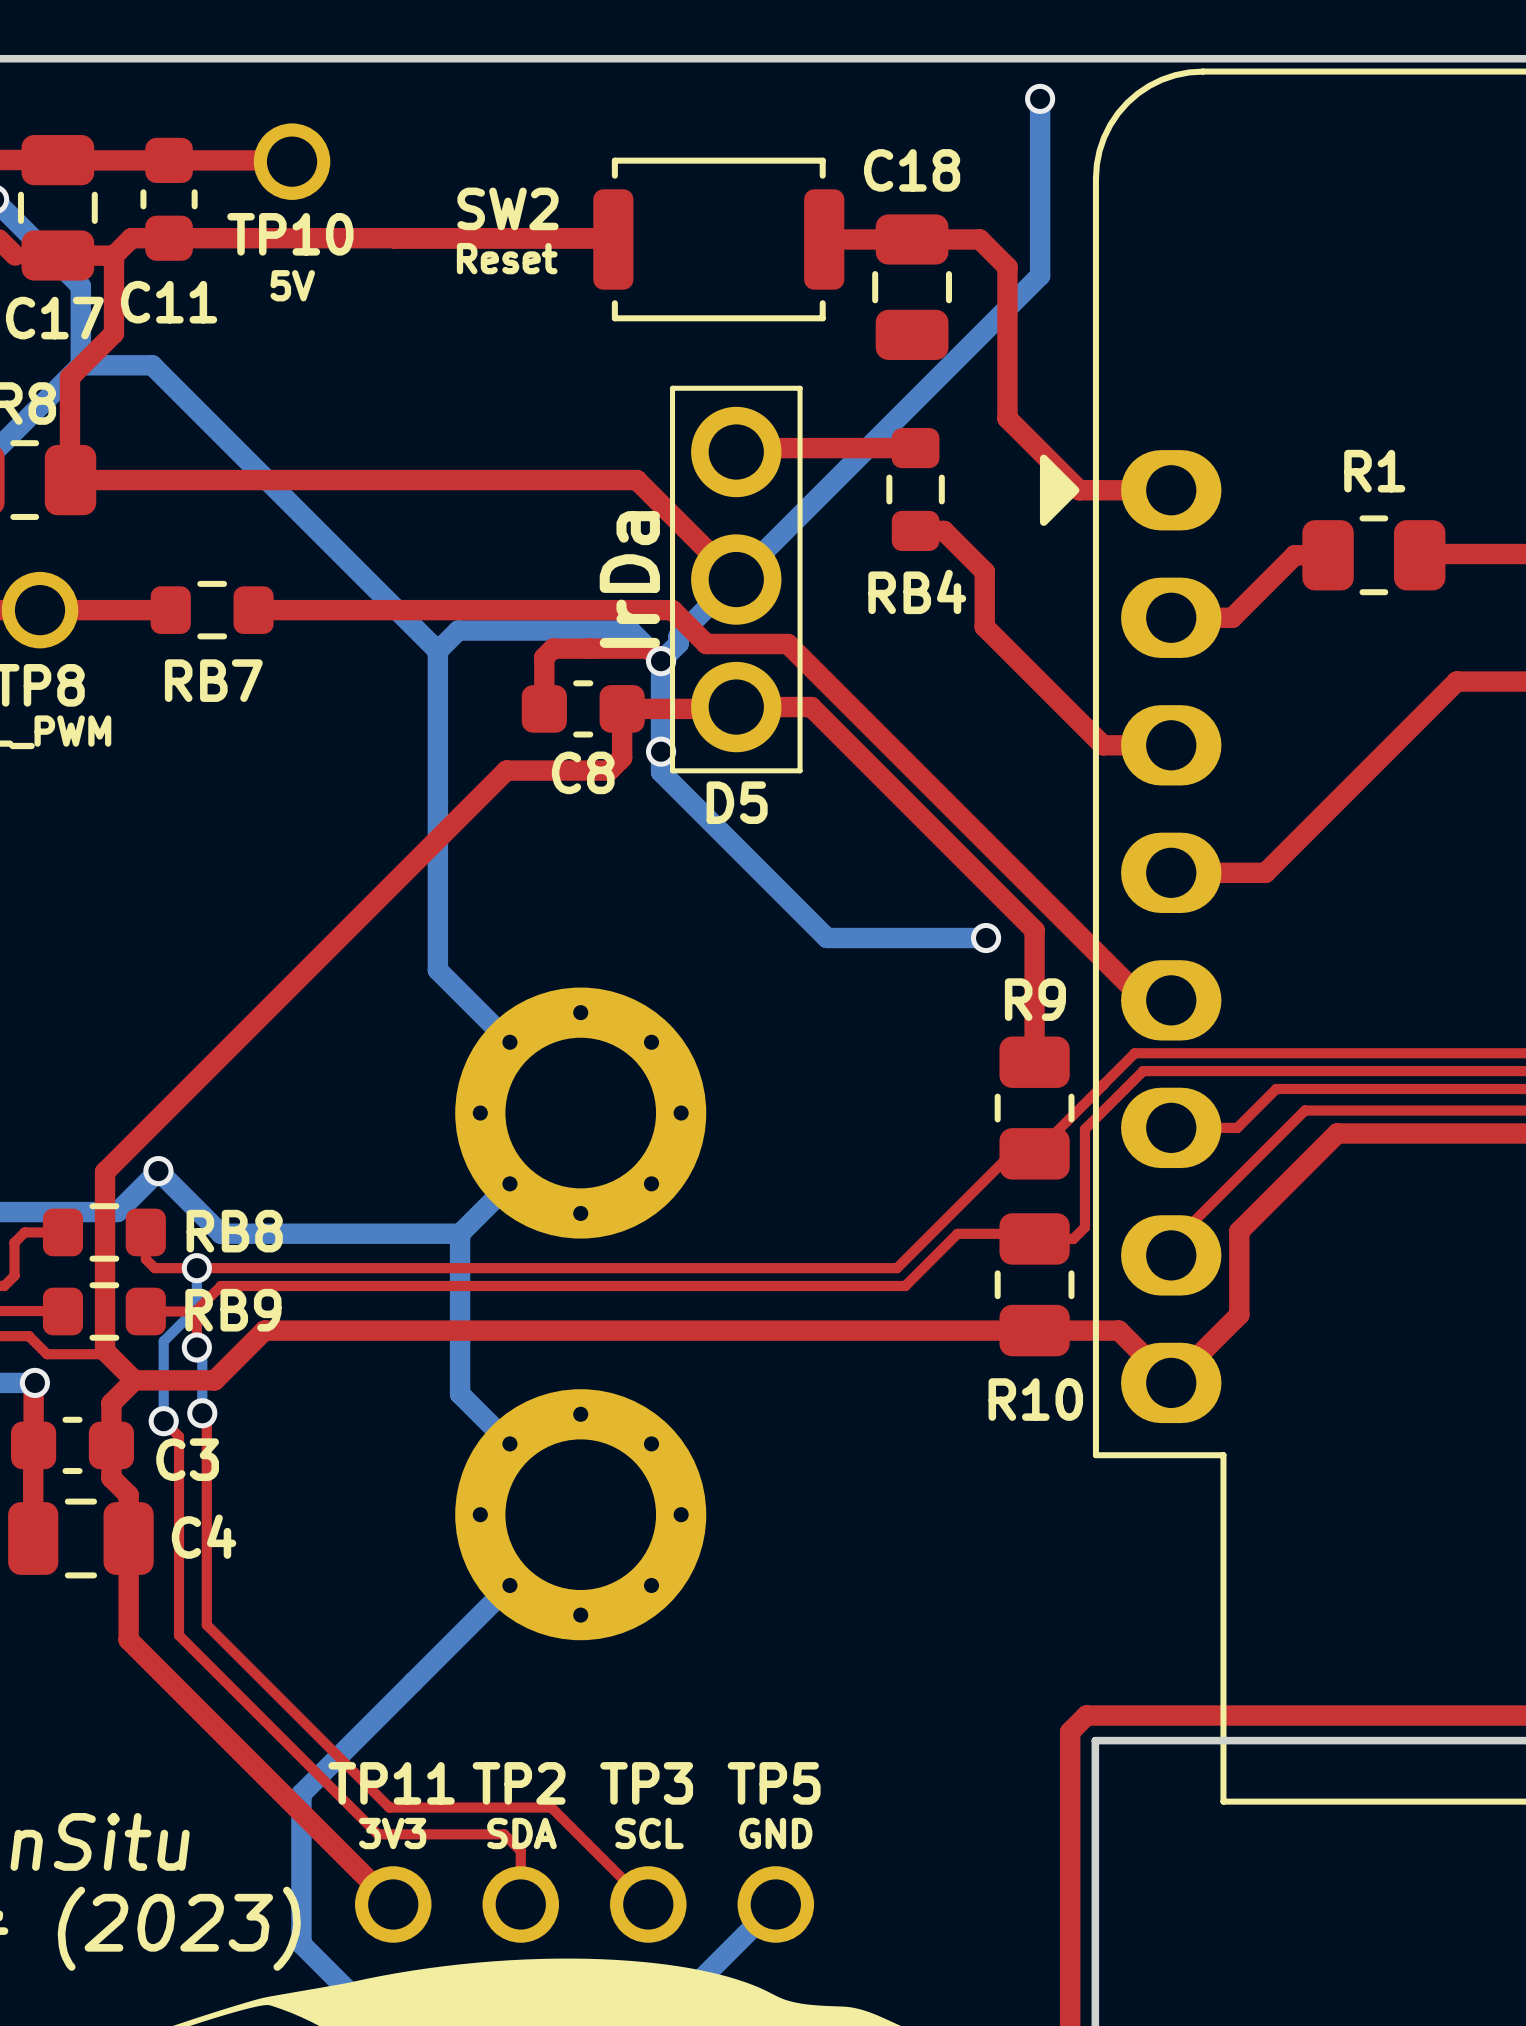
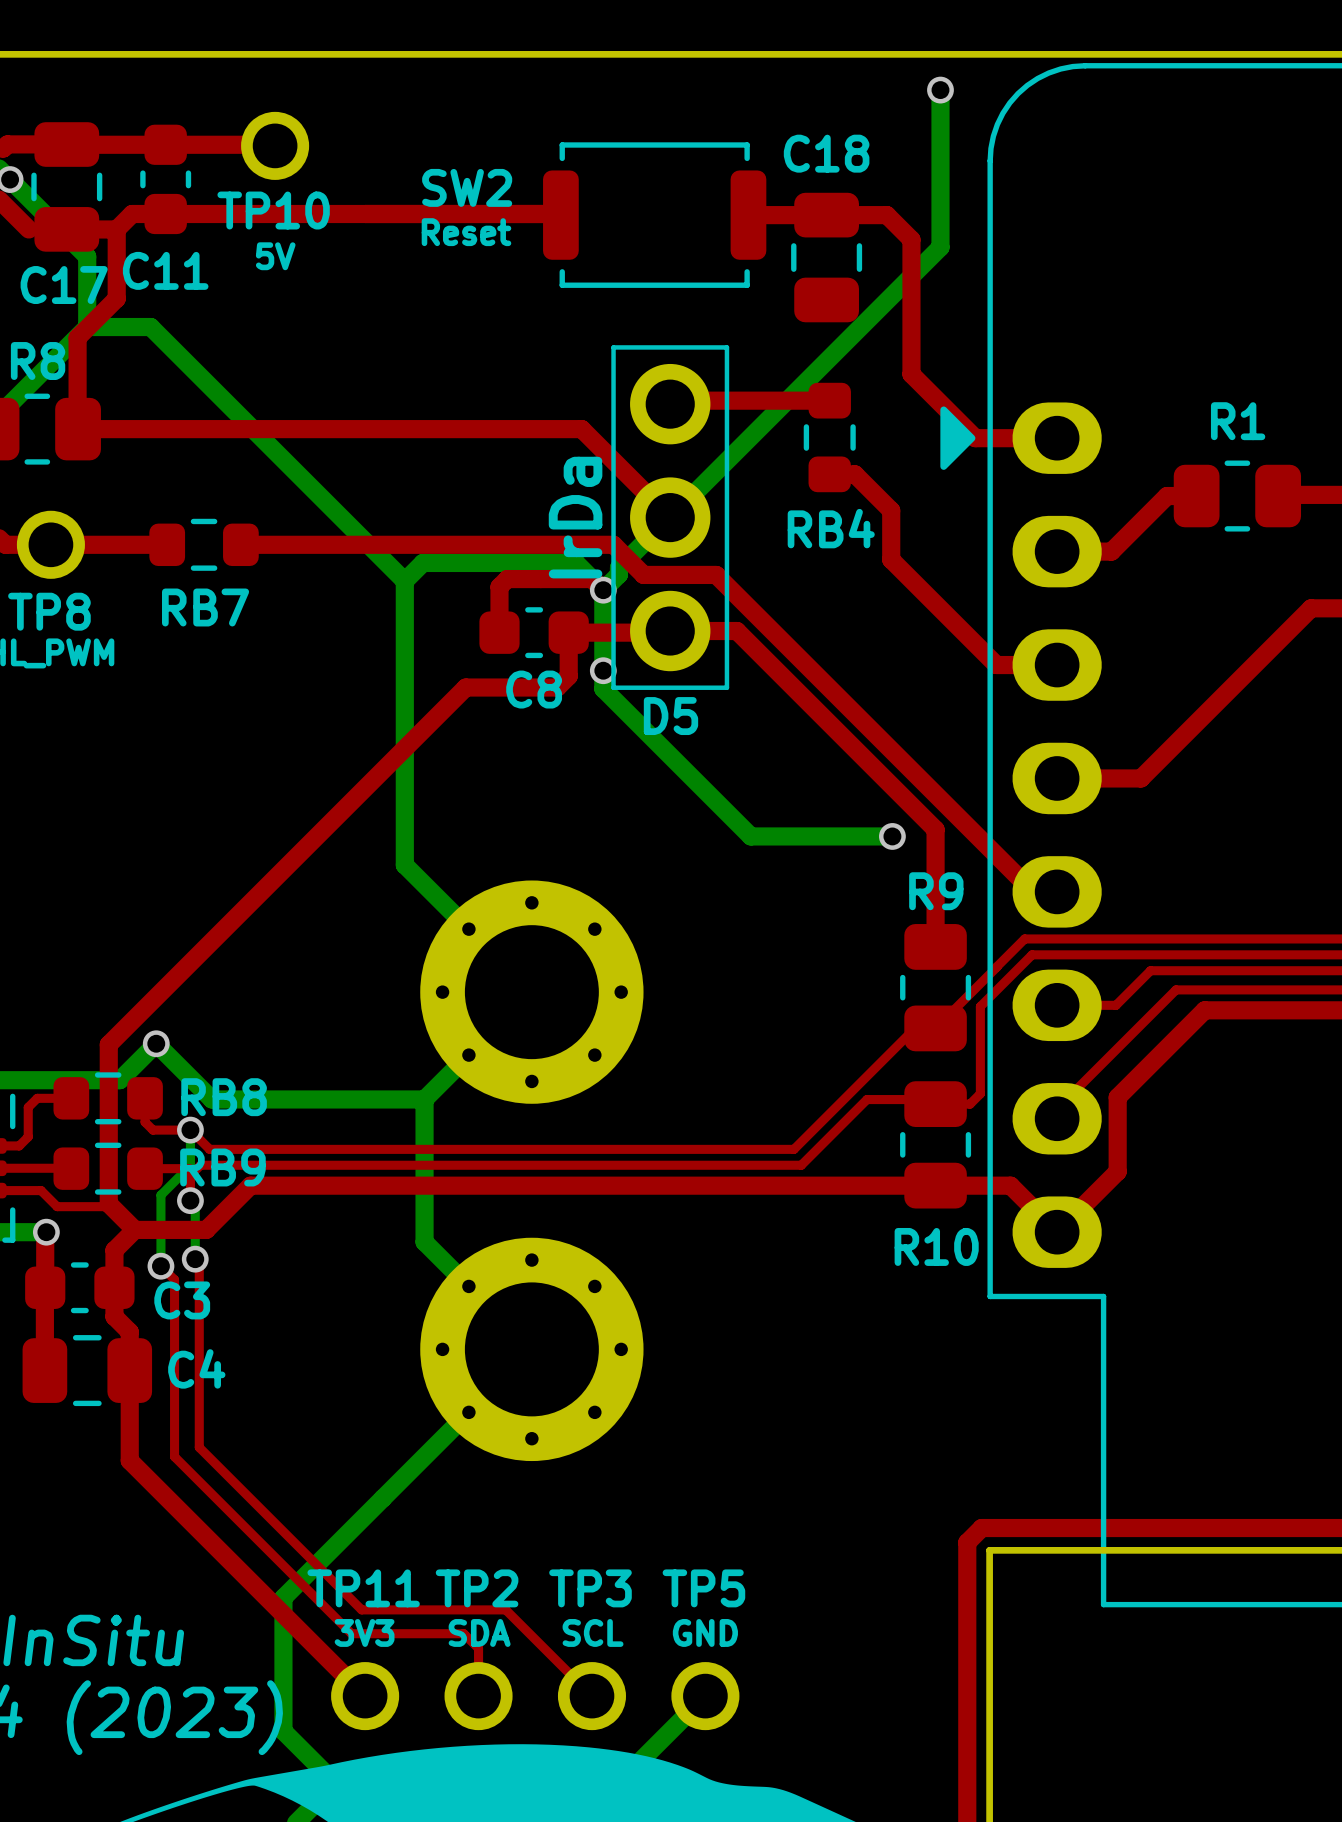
top track: (196, 1268) (897, 1268) -> (190, 1130) (209, 1149) (793, 1149) (813, 1130)
top track: (905, 1286) (221, 1286) (195, 1311) -> (820, 1145) (801, 1165) (200, 1165) (190, 1175)

